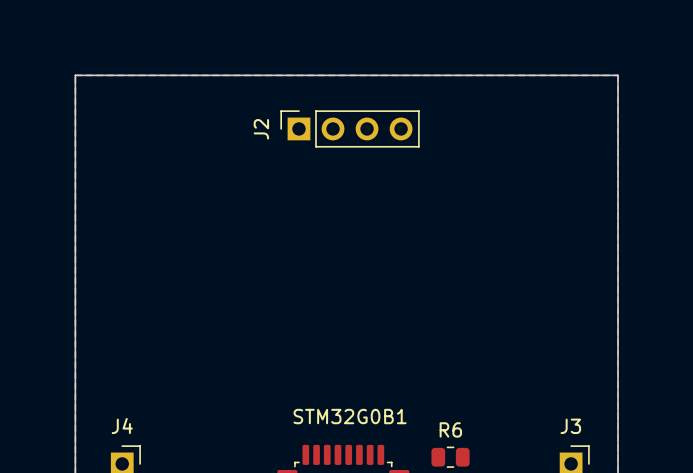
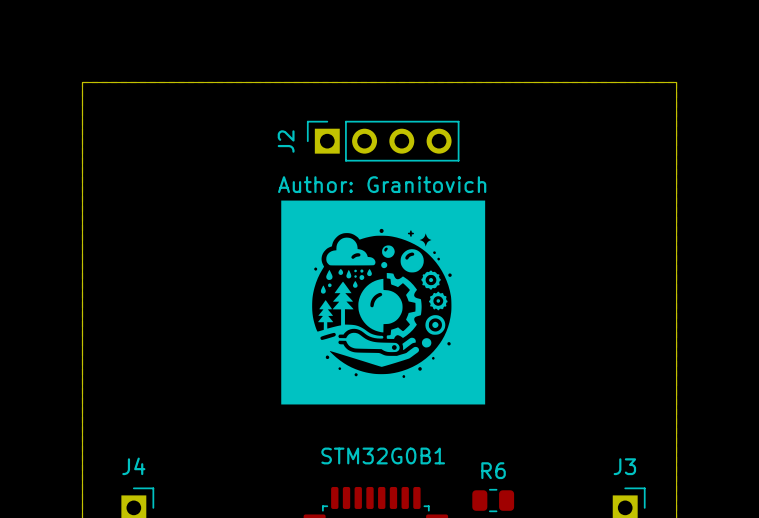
text: none -> Author: Granitovich (382, 184)
drawing: none -> [281, 200, 486, 405]

